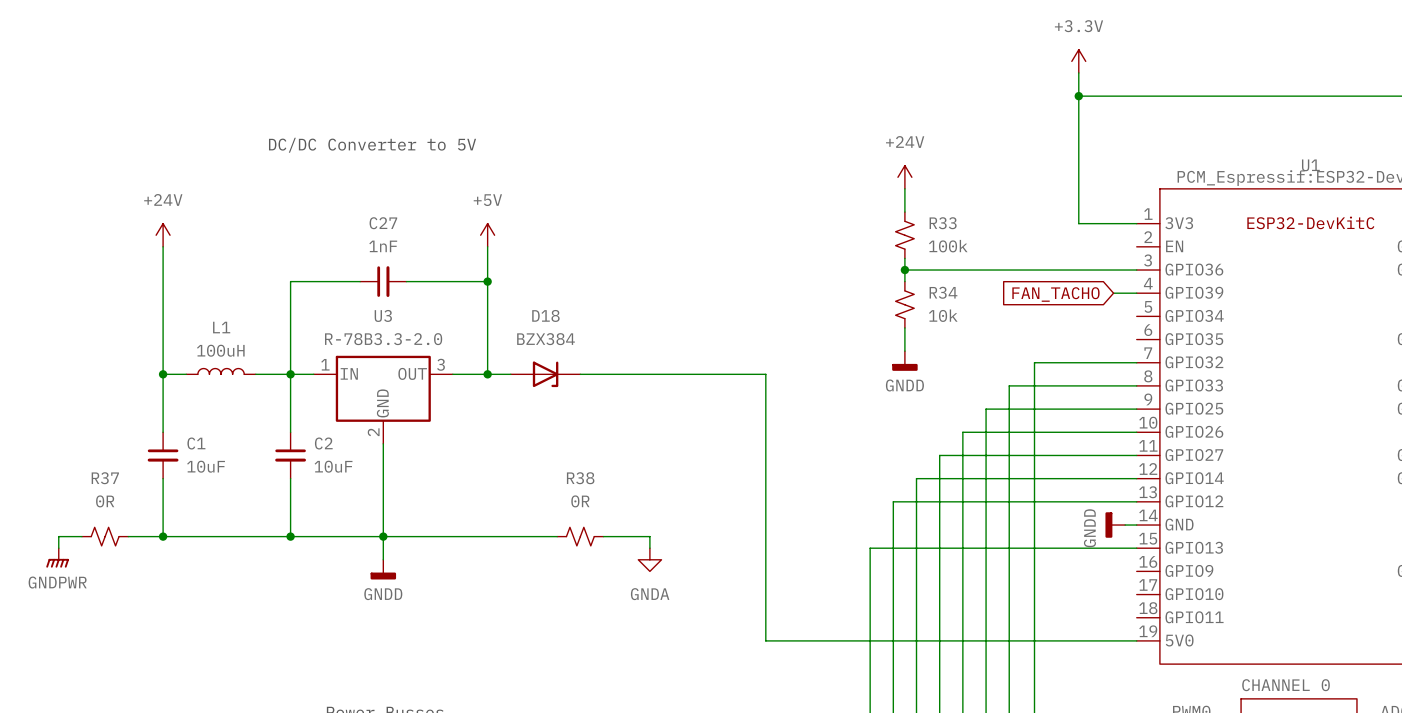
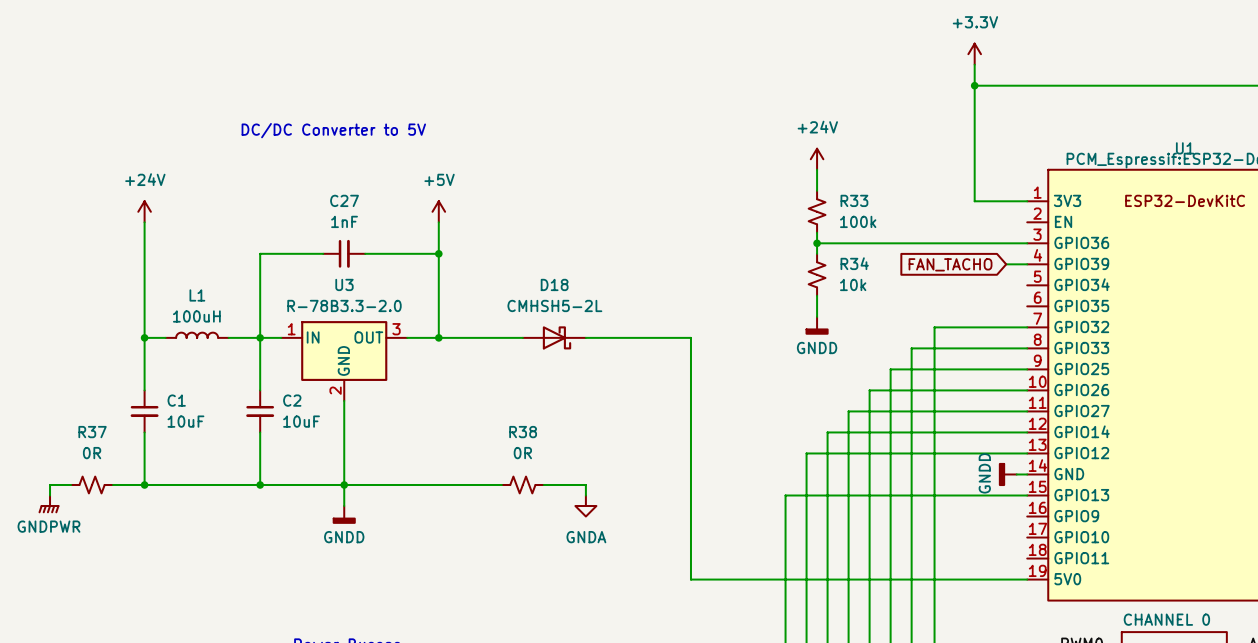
D18 value: BZX384 (546, 339) -> CMHSH5-2L (554, 305)
D18 symbol: [510, 361, 581, 388] -> [522, 326, 586, 350]

